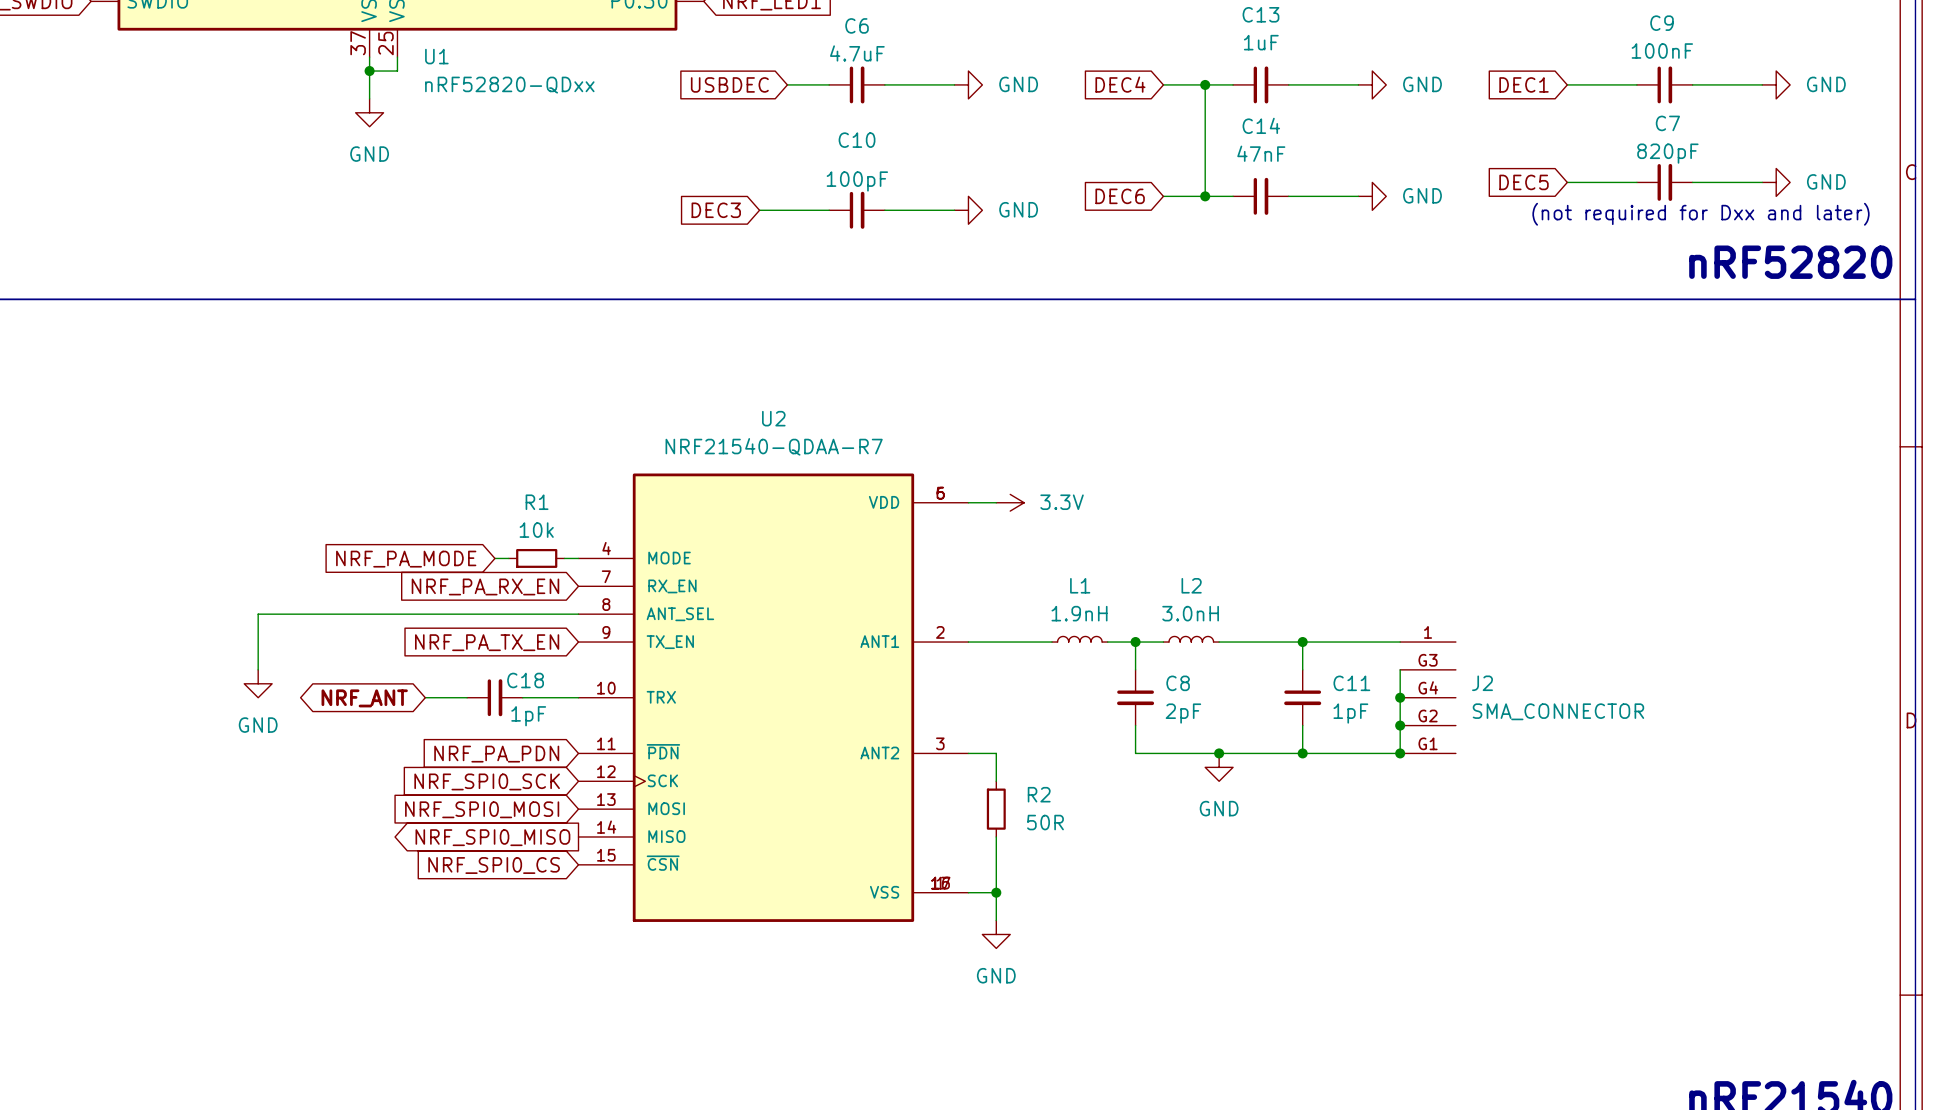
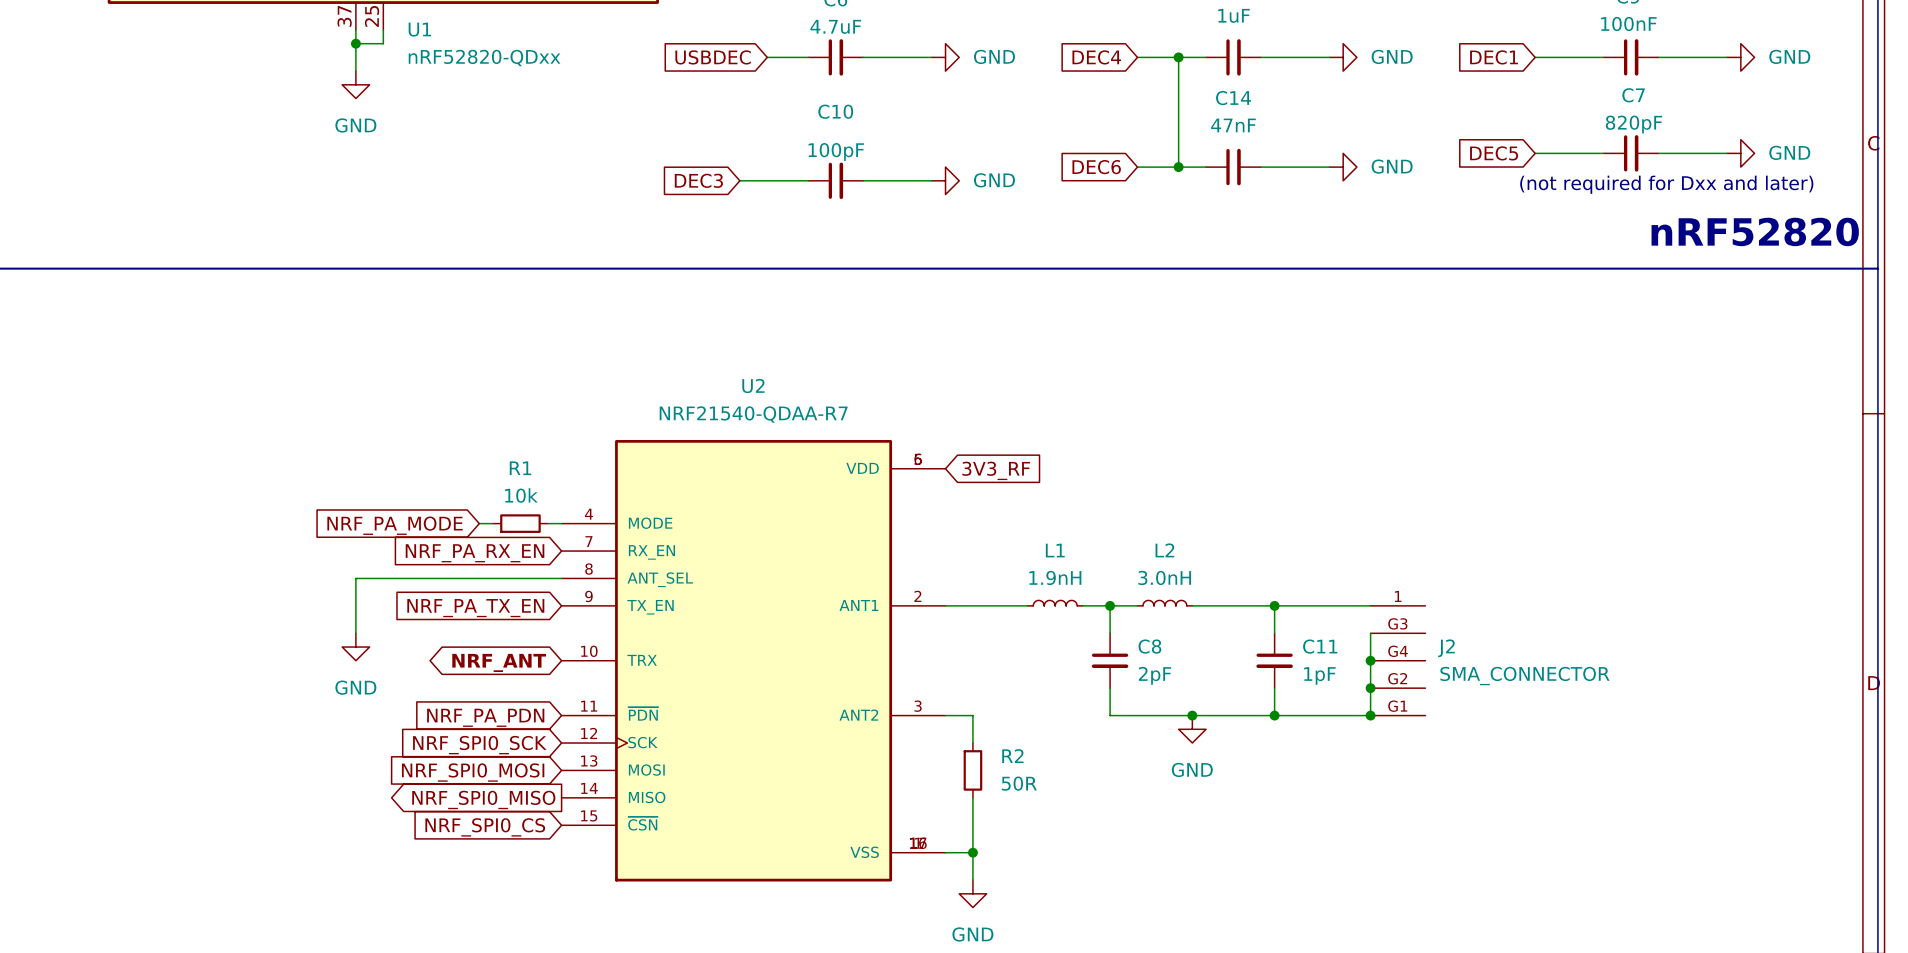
wire: (968, 502) (996, 502) -> none
power symbol: 3.3V (1010, 502) -> none
global label: none -> 3V3_RF (996, 470)
wire: (369, 614) (258, 614) (258, 669) -> (355, 578) (355, 633)
power symbol position: GND (258, 683) -> GND (355, 647)
wire: (425, 697) (467, 697) -> none
C18: 1pF (494, 697) -> none
wire: (522, 697) (578, 697) -> none
global label position: NRF_ANT (364, 698) -> NRF_ANT (499, 662)

